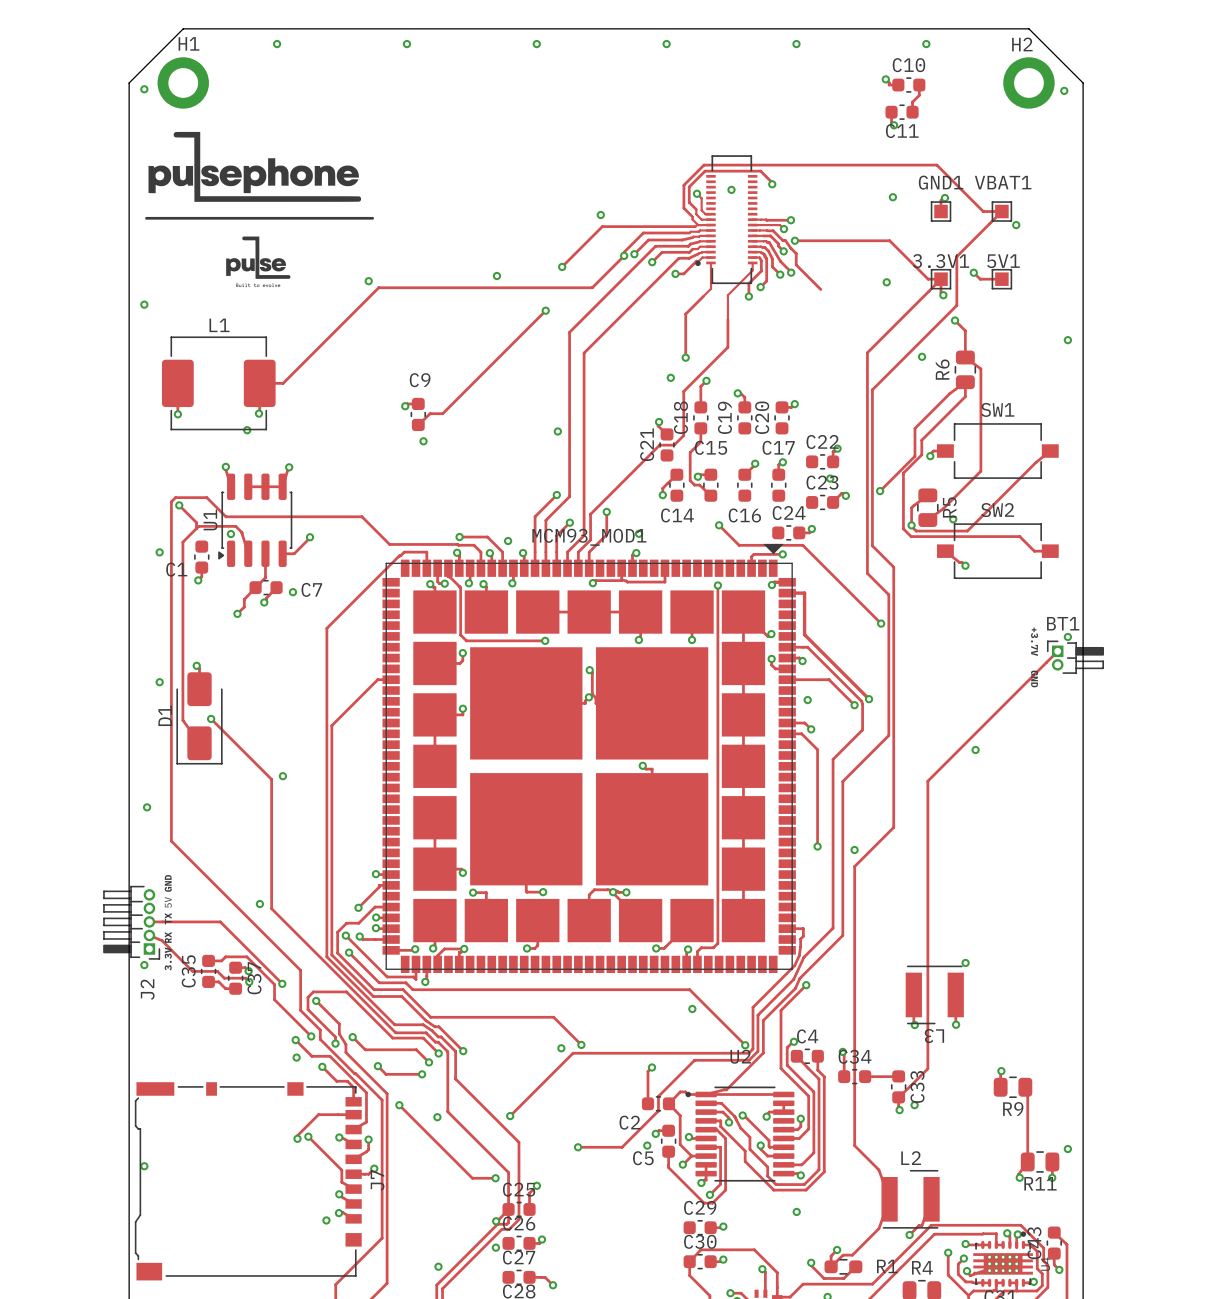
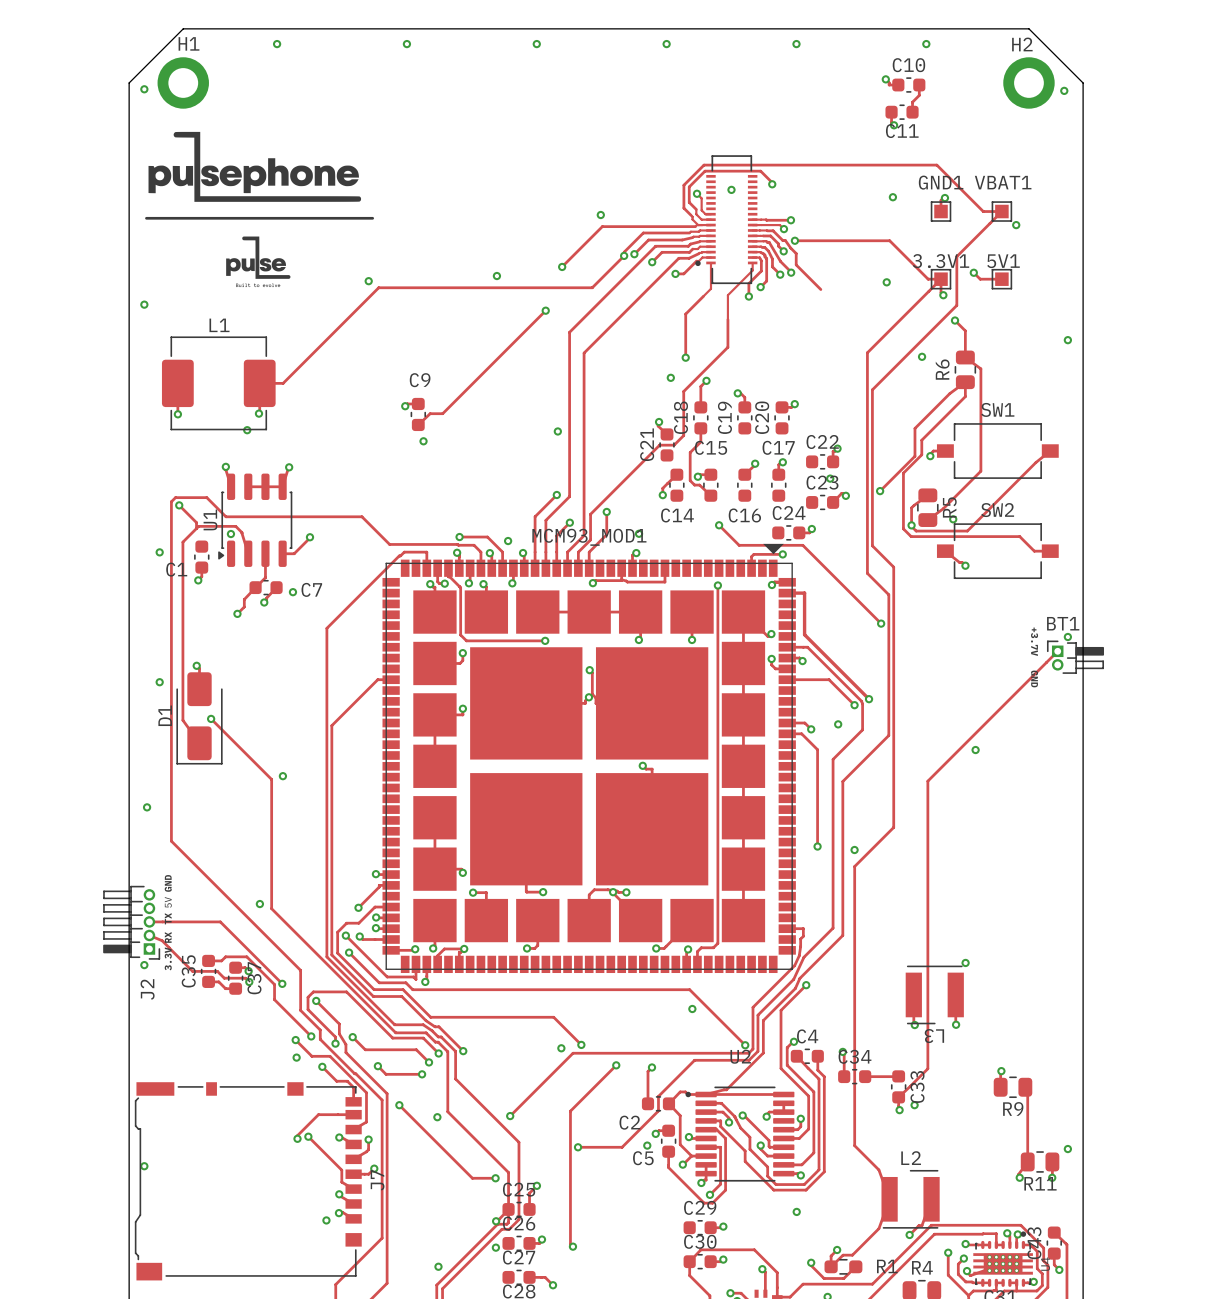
via position: (807, 700) -> (838, 724)
track: none -> (616, 1065) (570, 1111) (570, 1244) (572, 1246)
via: none -> (616, 1065)
via: none -> (572, 1246)

